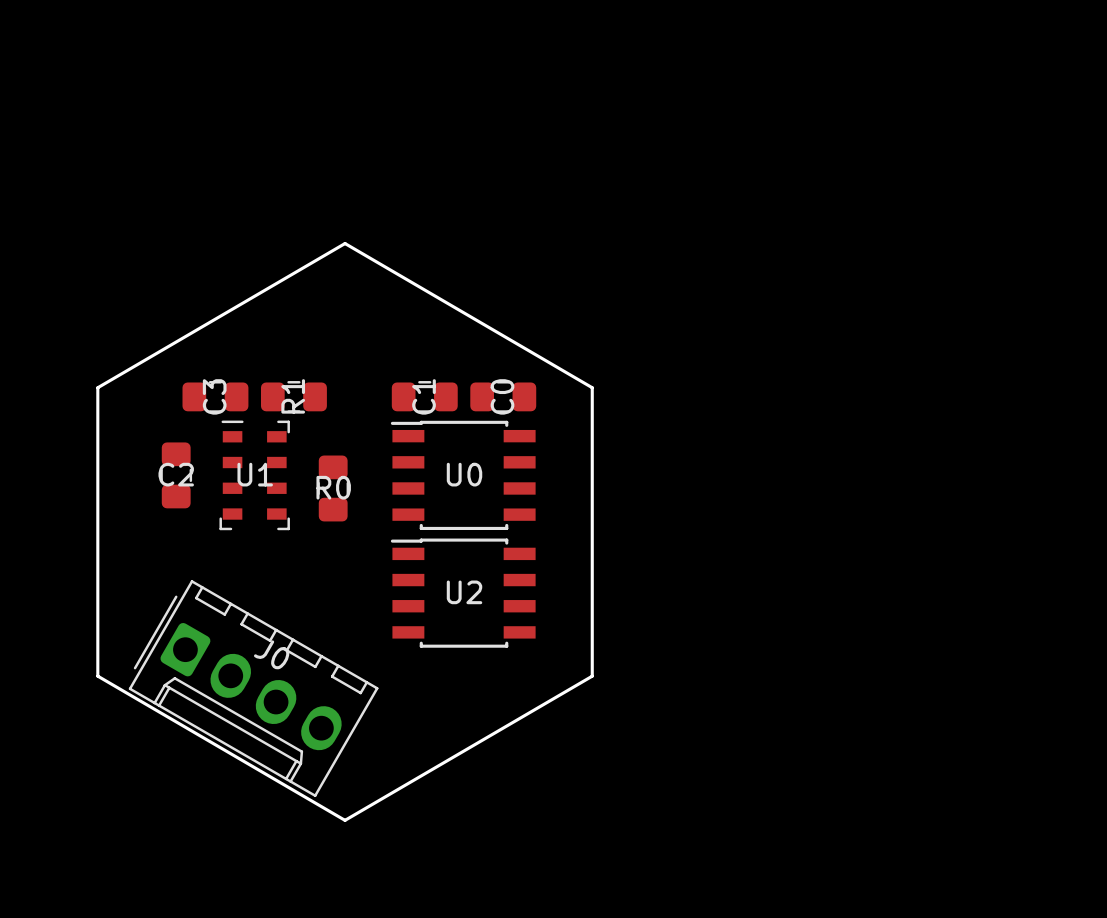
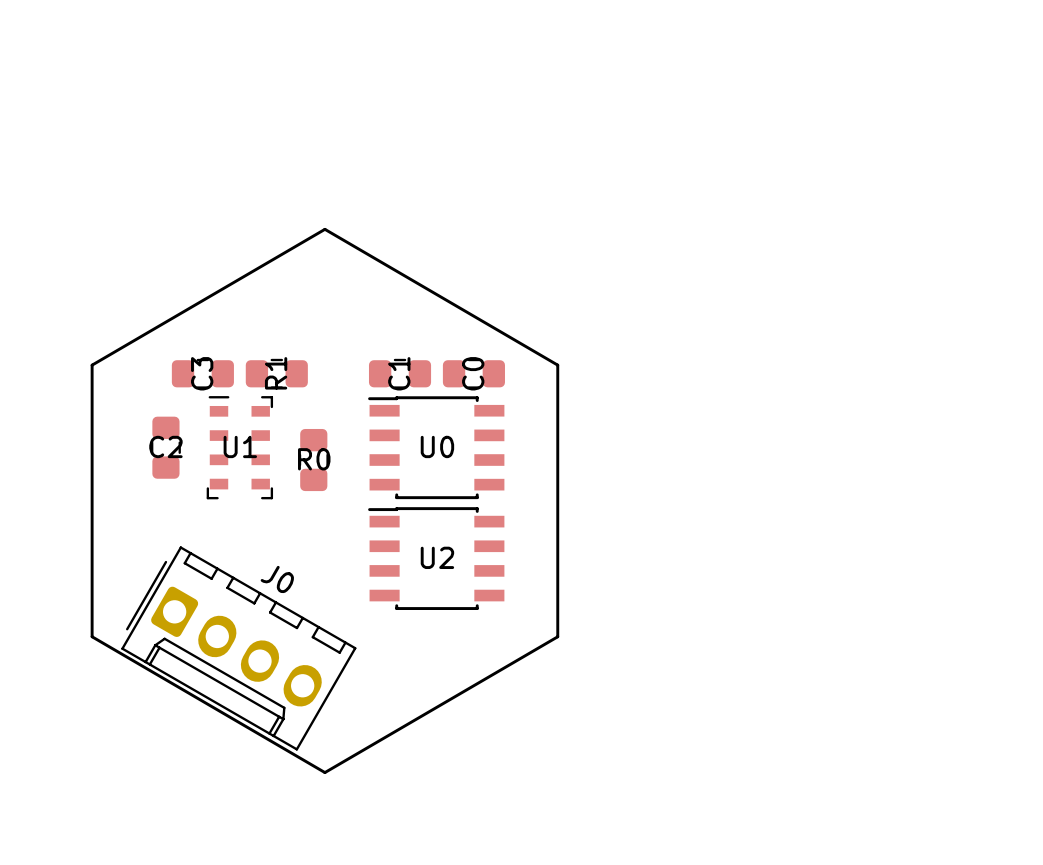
J0 name position: J0 (271, 654) -> J0 (277, 579)

